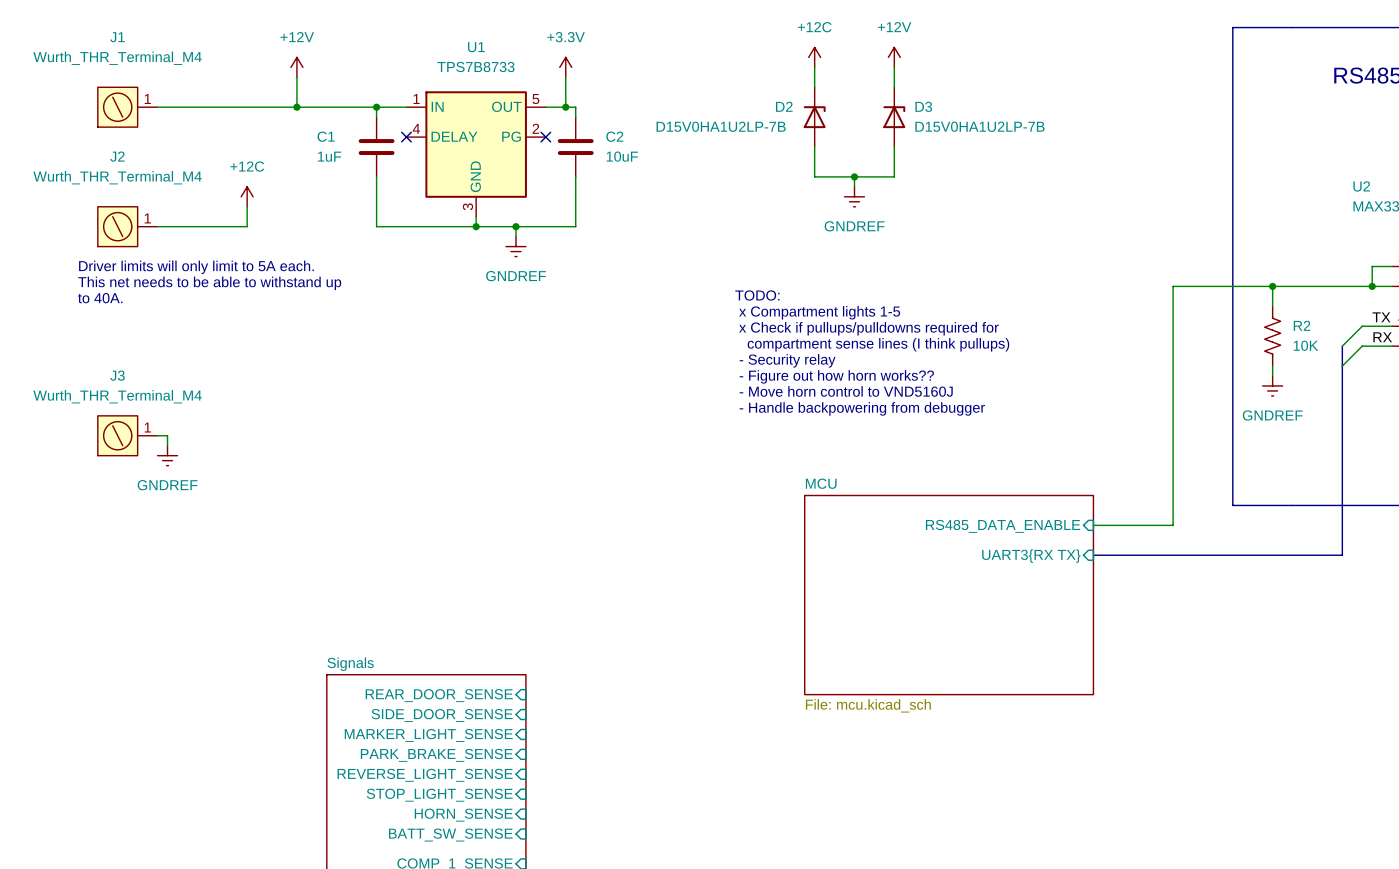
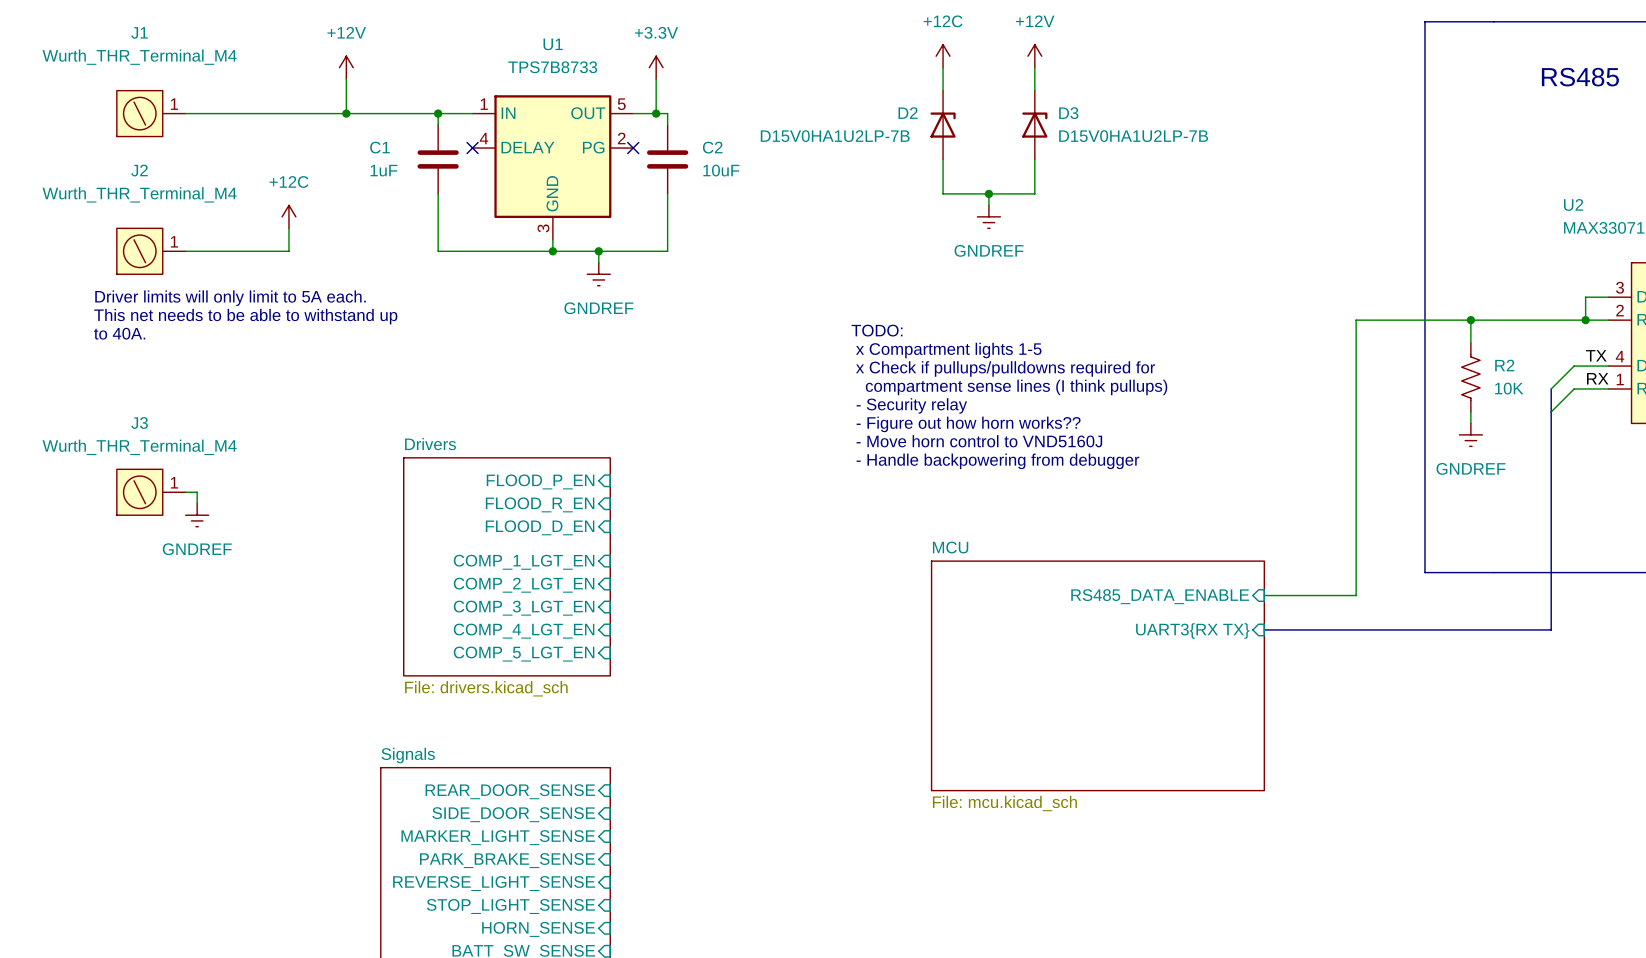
sheet pin: none -> FLOOD_P_EN (540, 481)
sheet pin: none -> FLOOD_R_EN (540, 504)
sheet pin: none -> FLOOD_D_EN (540, 527)
sheet pin: none -> COMP_1_LGT_EN (524, 562)
sheet Drivers: none -> File: drivers.kicad_sch (506, 566)
sheet pin: none -> COMP_2_LGT_EN (524, 585)
sheet pin: none -> COMP_3_LGT_EN (524, 608)
sheet pin: none -> COMP_4_LGT_EN (524, 631)
sheet pin: none -> COMP_5_LGT_EN (524, 654)

